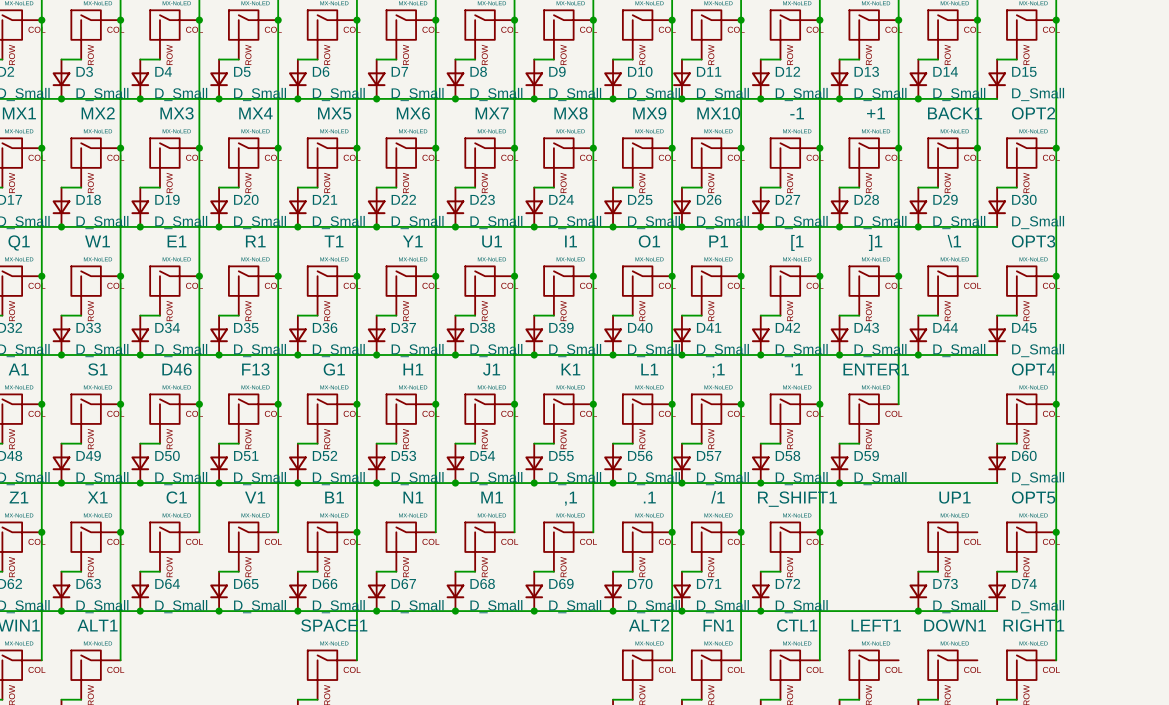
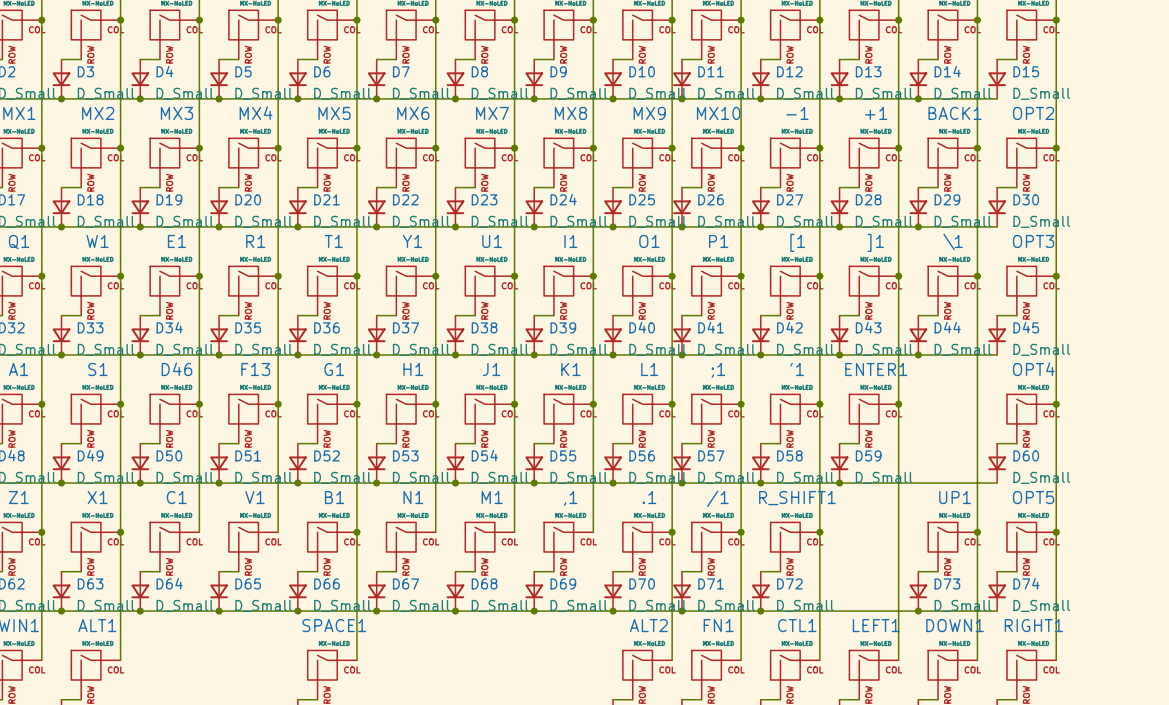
wire: none -> (977, 276) (977, 660)
junction: none -> (977, 276)
wire: none -> (898, 404) (898, 660)
junction: none -> (898, 404)
junction: none -> (977, 532)

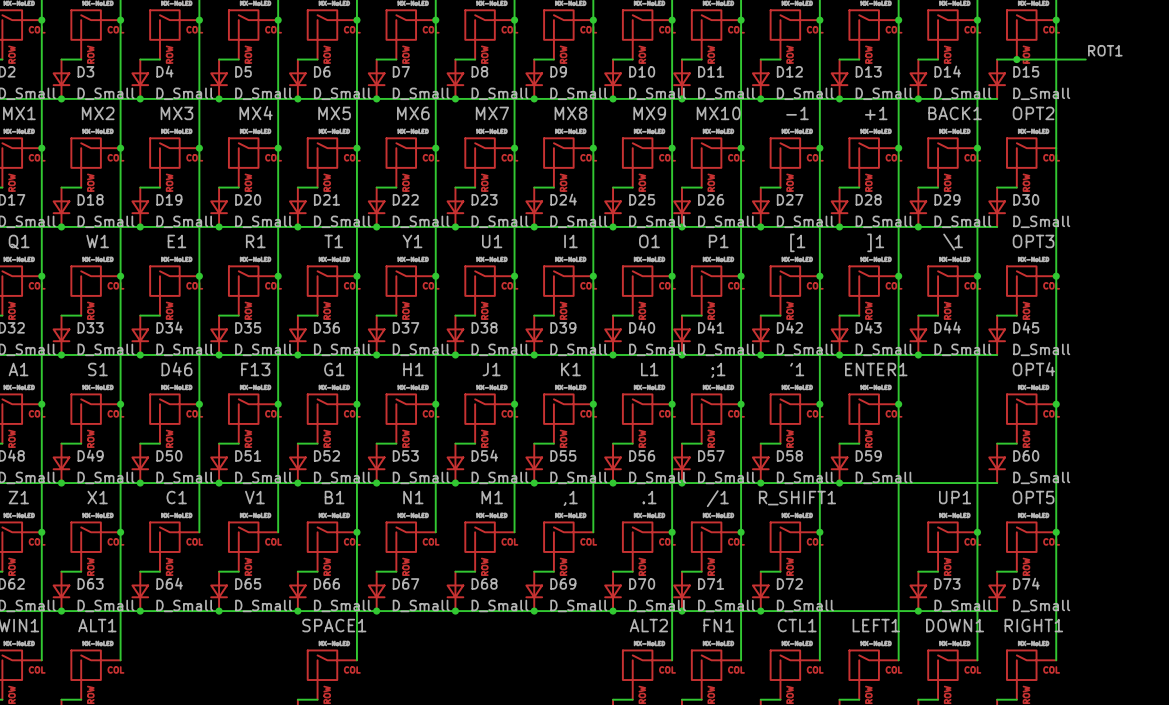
label: none -> ROT1 (1105, 50)
wire: none -> (1016, 59) (1085, 59)
junction: none -> (1016, 59)
junction: (1056, 148) -> none

